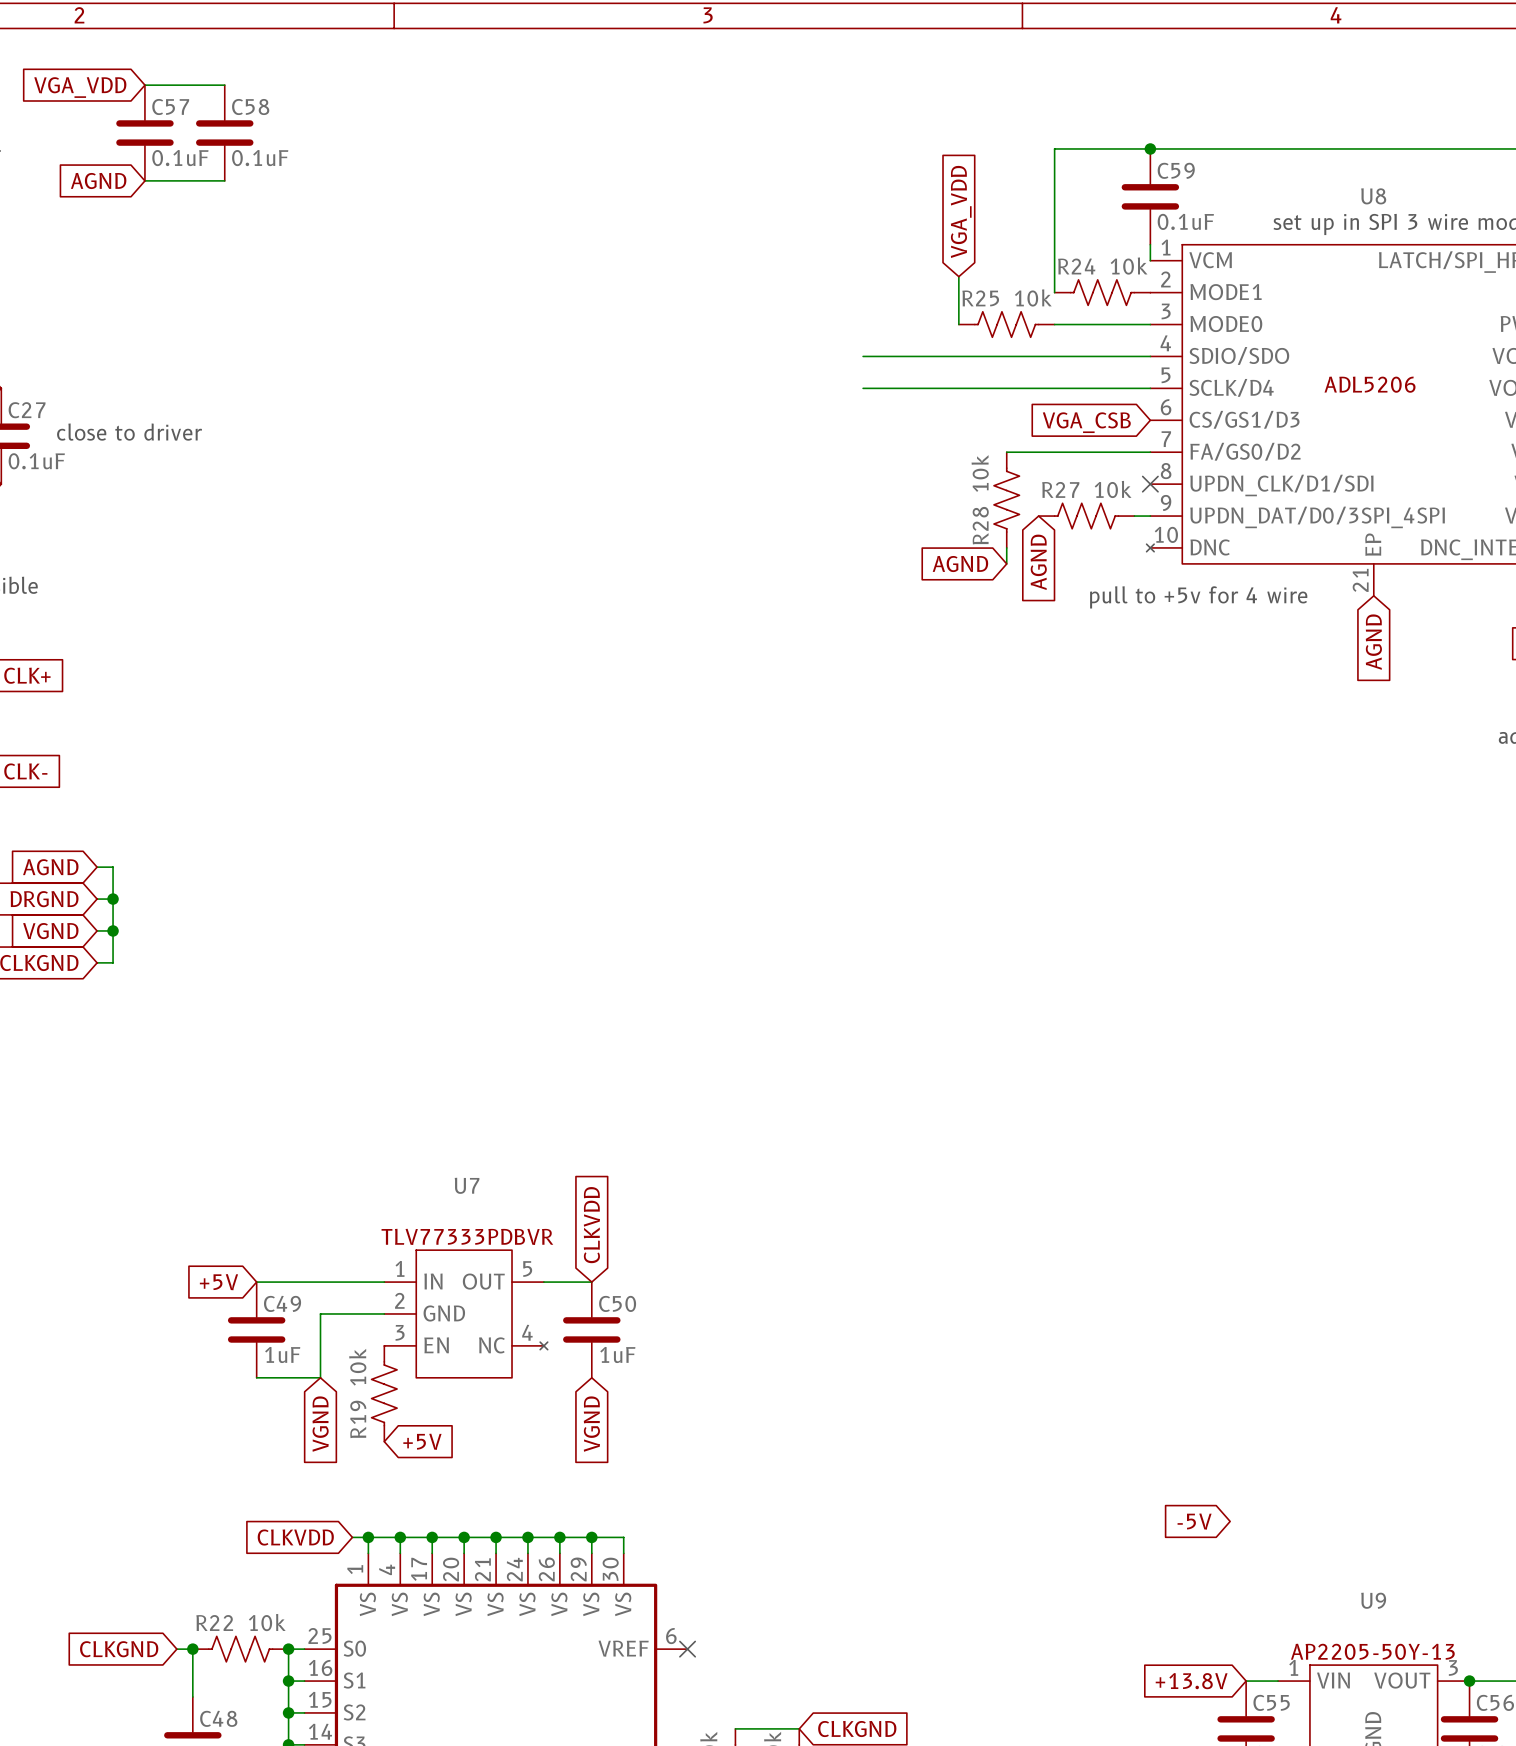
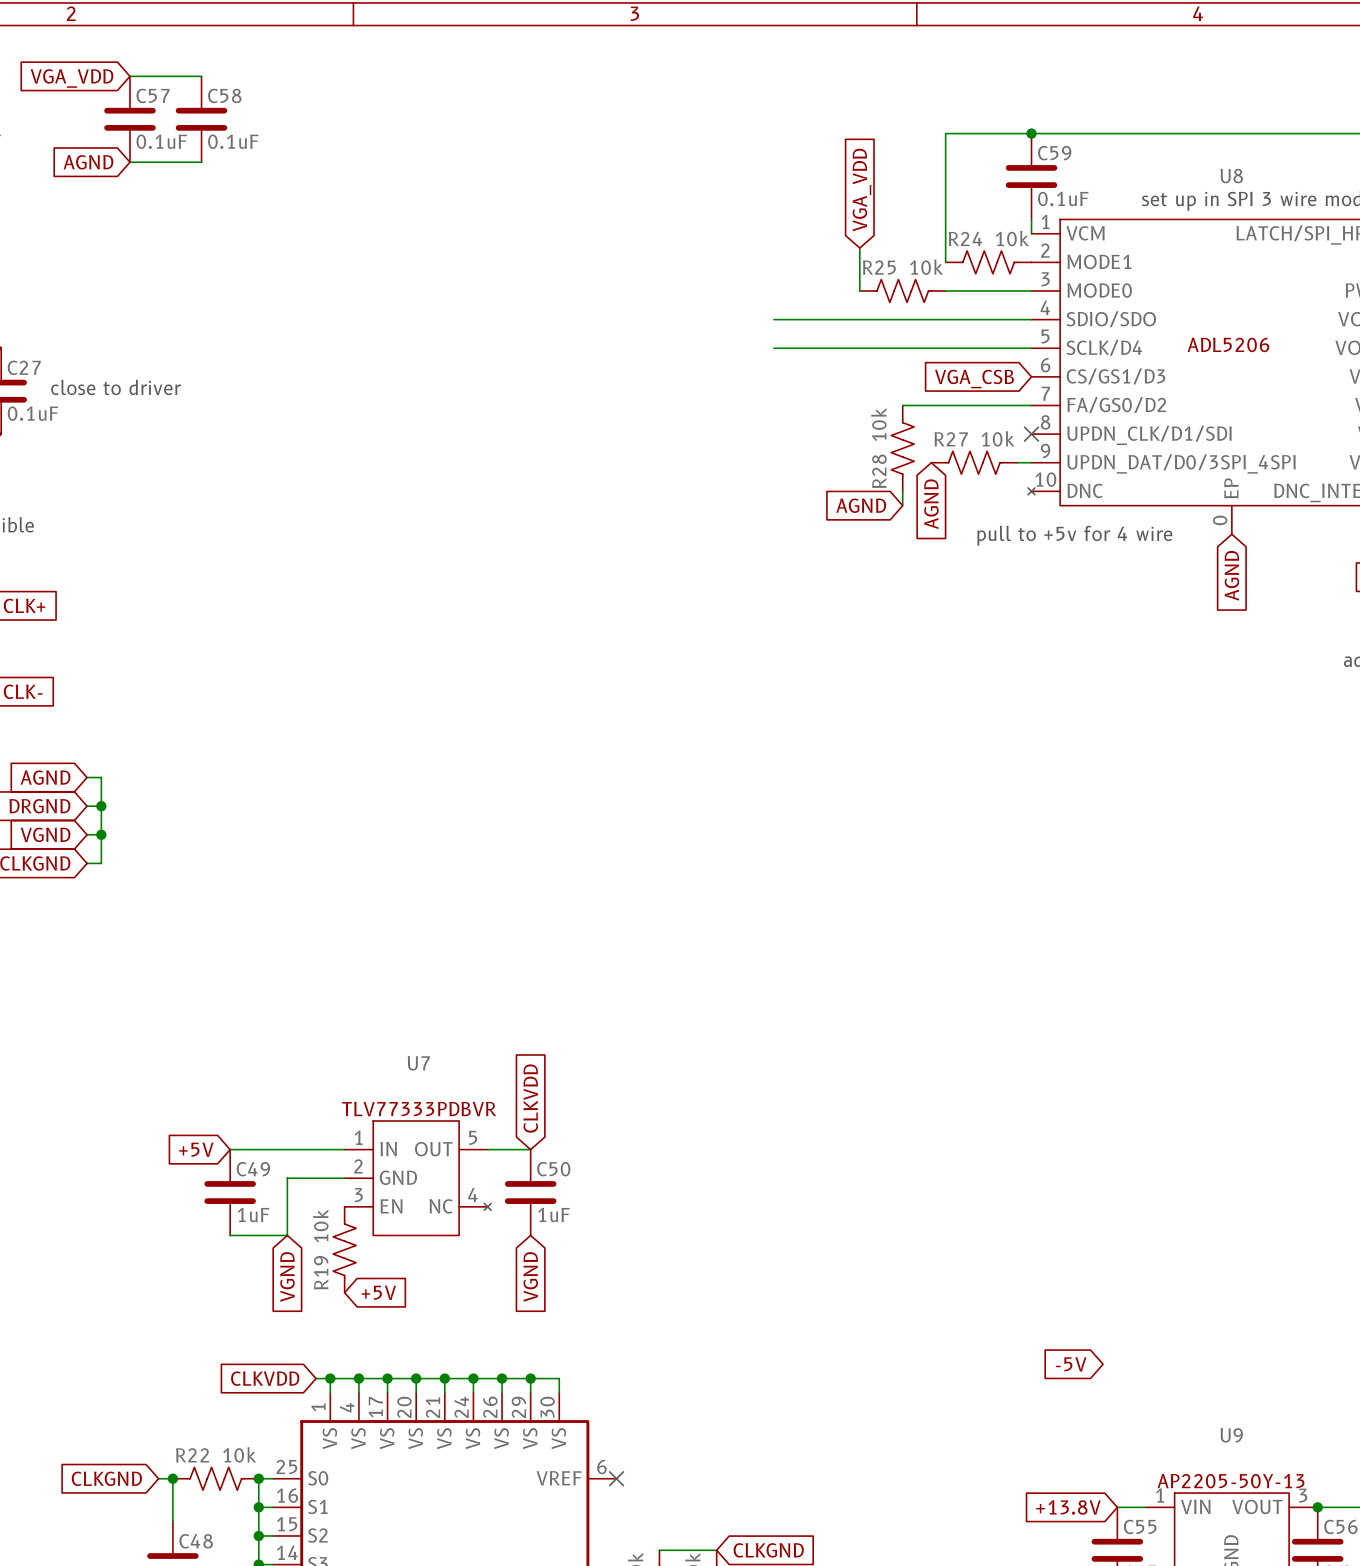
U8 pin number: 21 (1360, 580) -> 0 (1220, 520)

